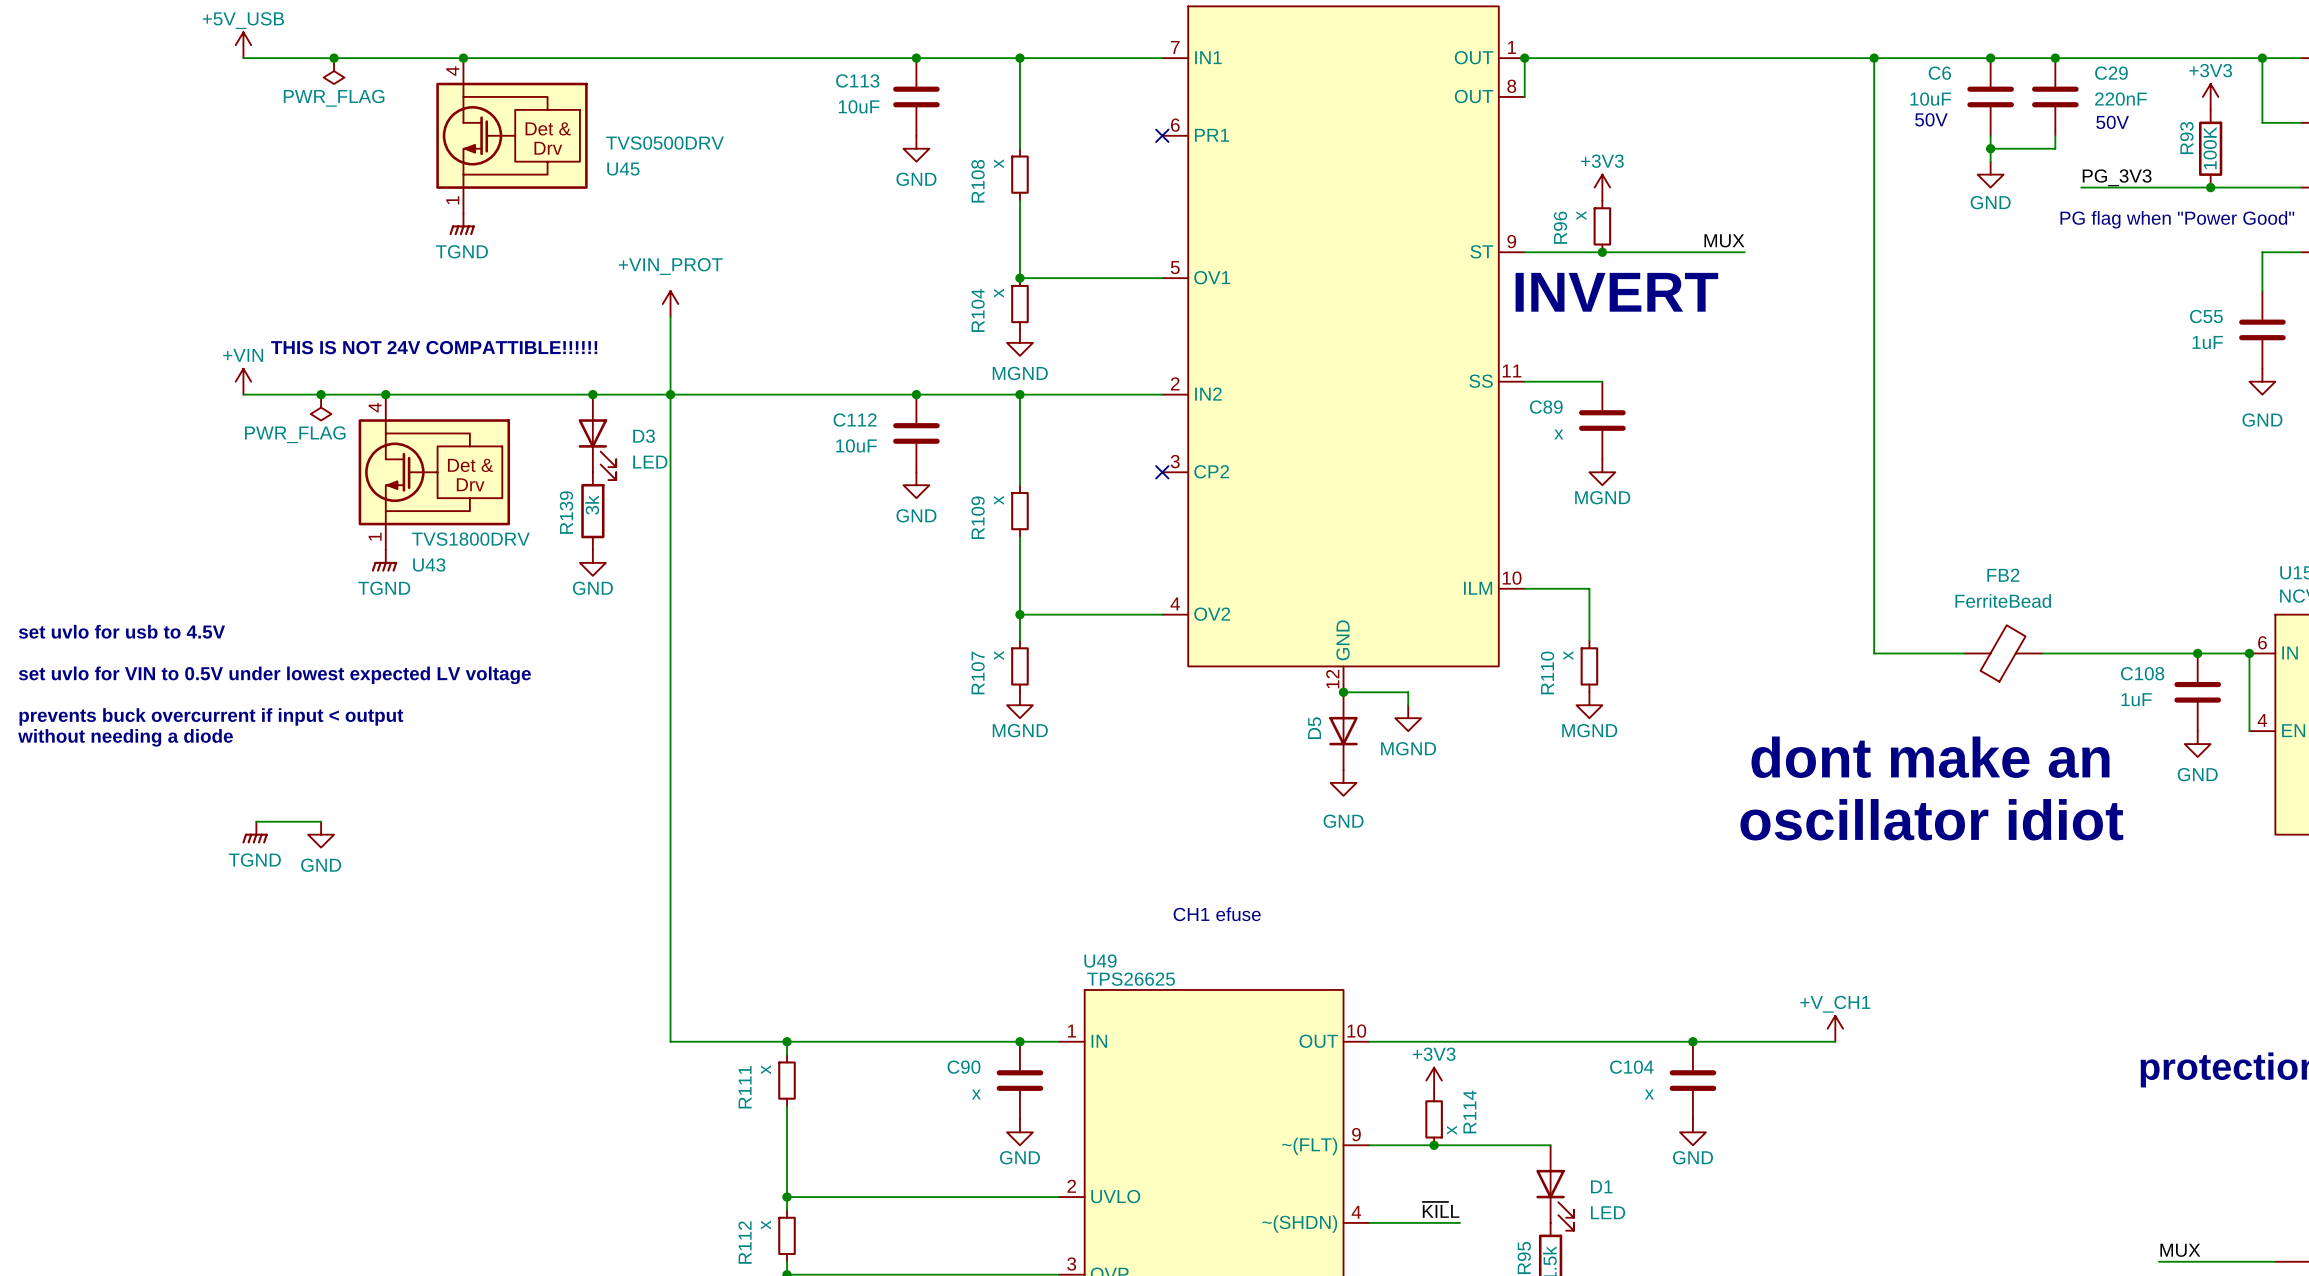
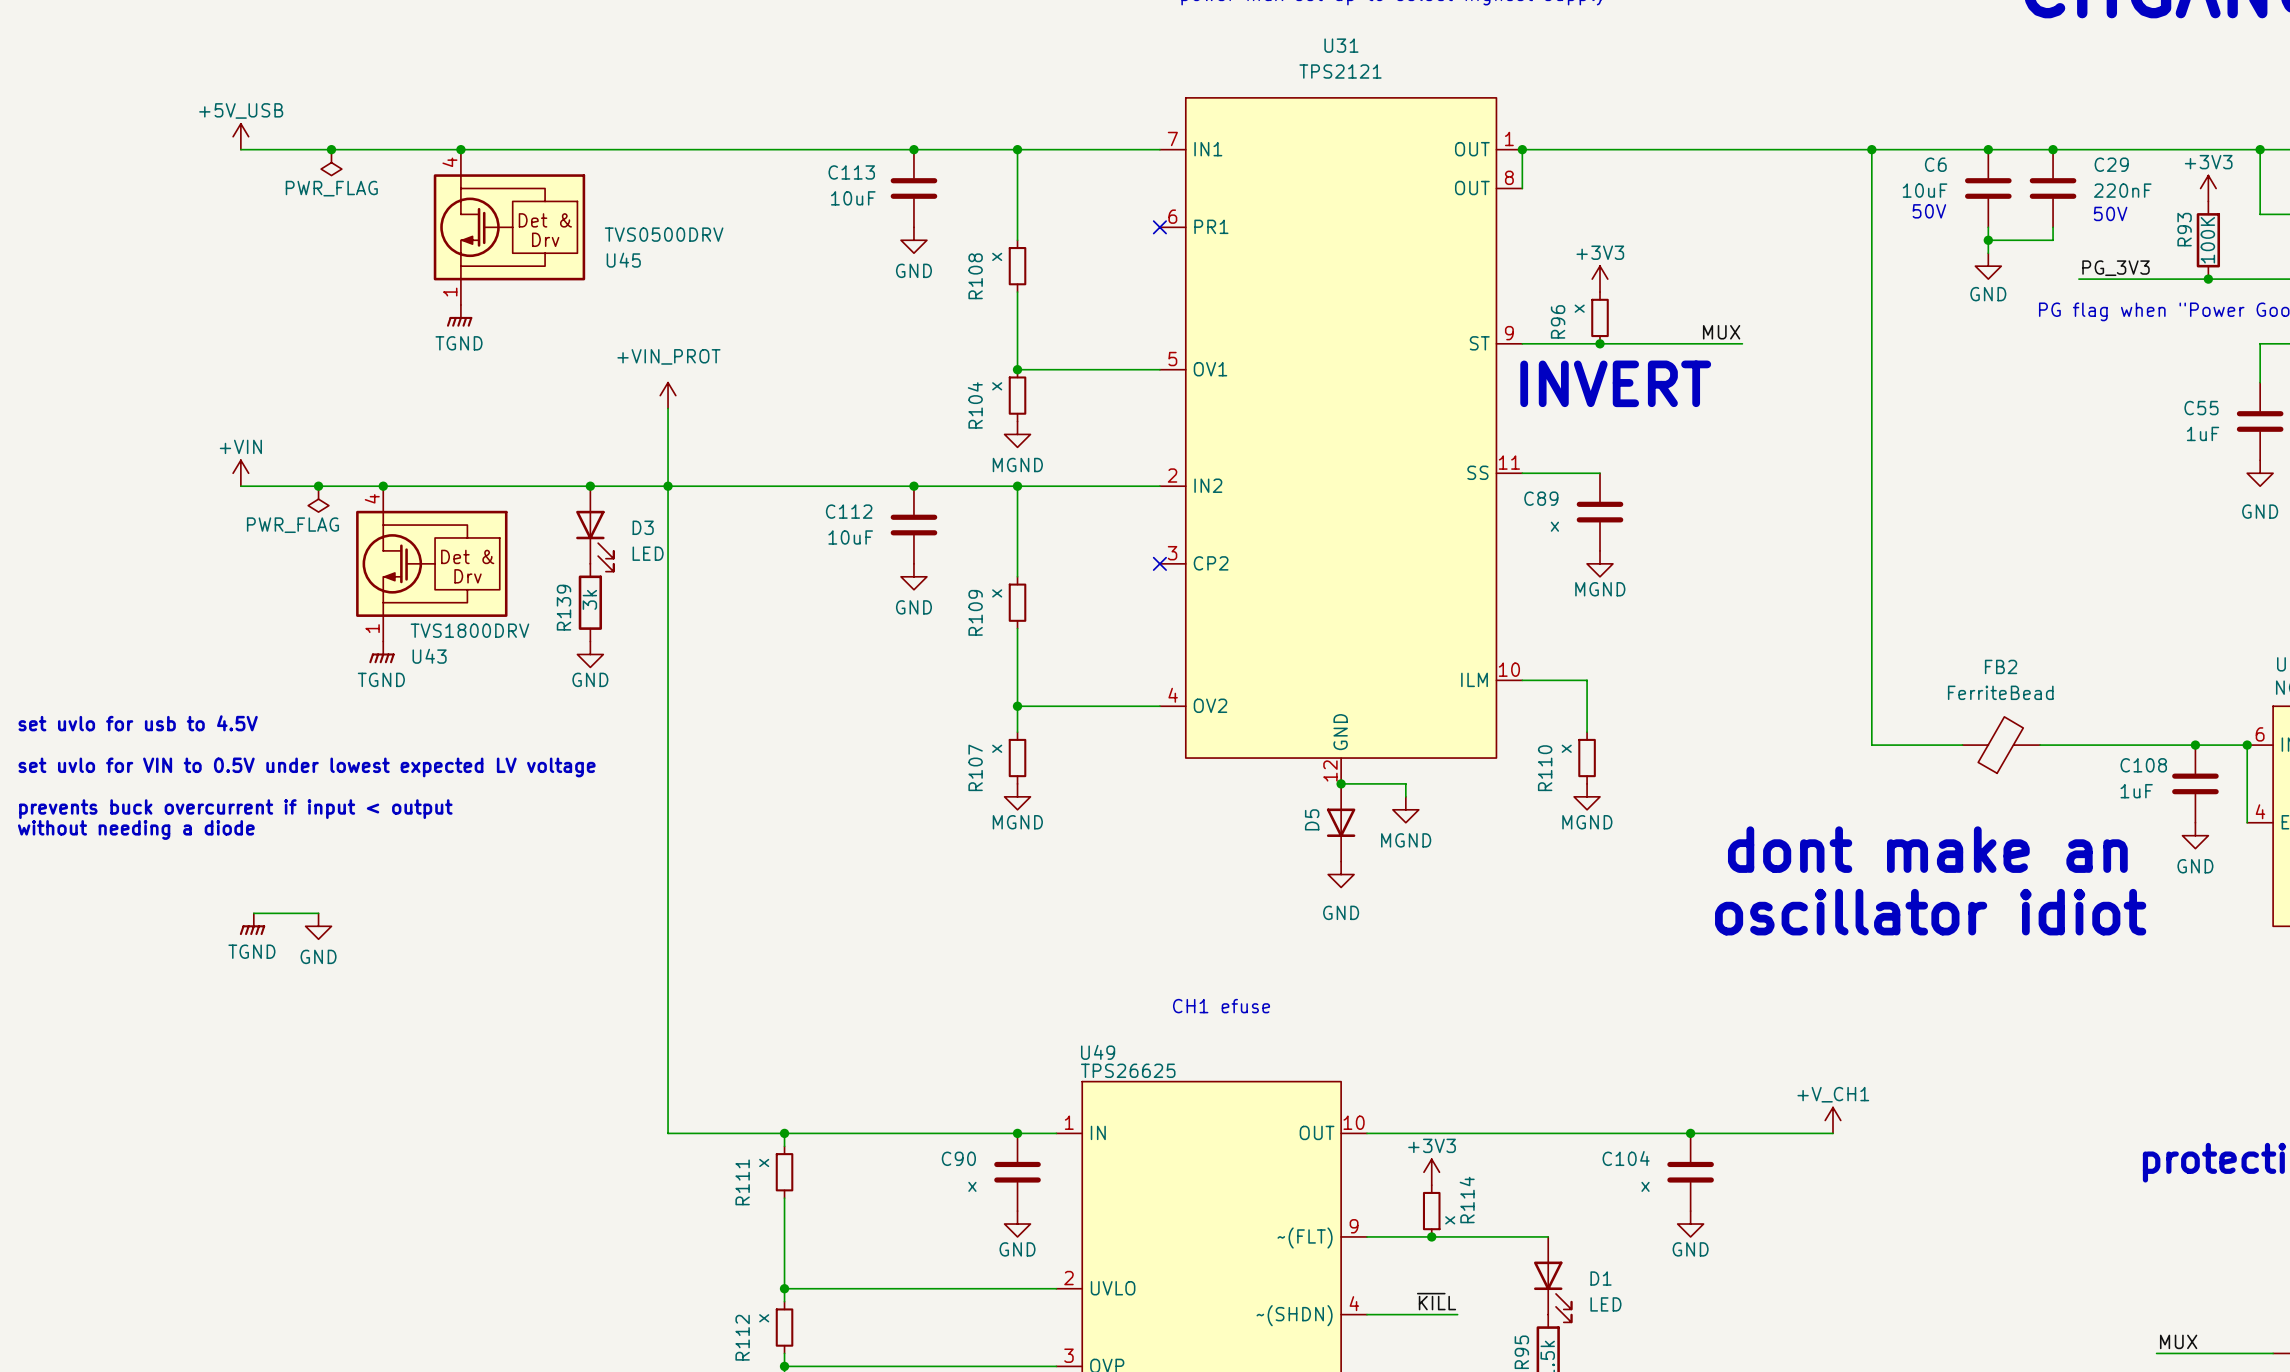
text: THIS IS NOT 24V COMPATTIBLE!!!!!! (434, 347) -> none

